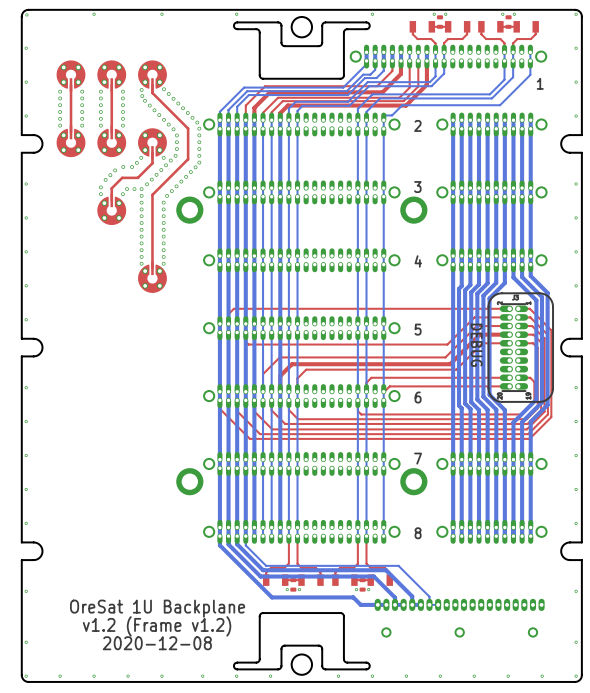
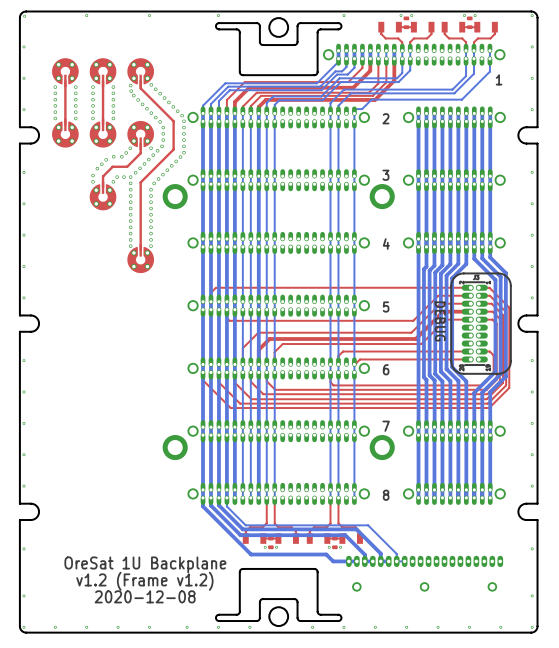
part footprint: [499, 303, 529, 392] -> [461, 281, 488, 366]

